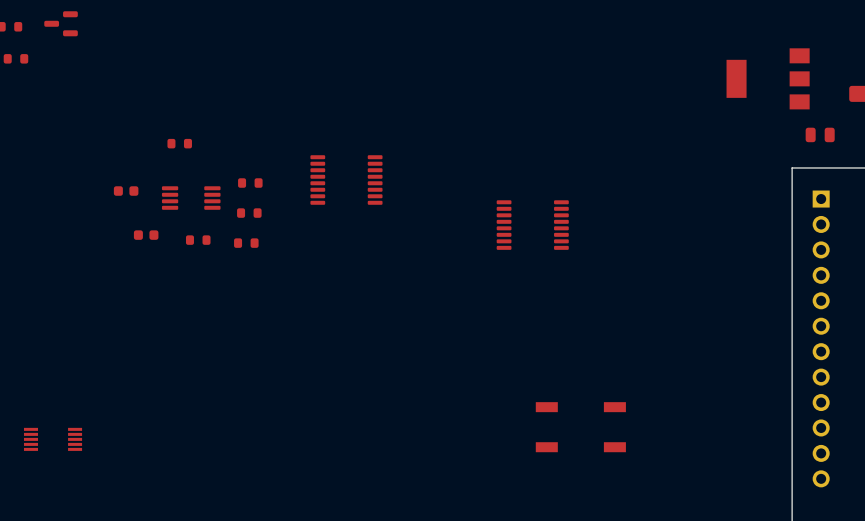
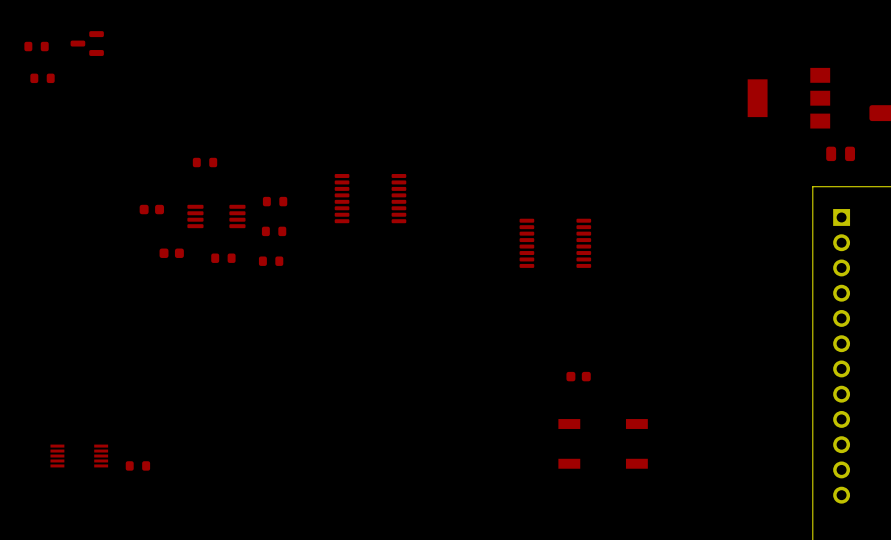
part: none -> (578, 376)
part: none -> (137, 465)

